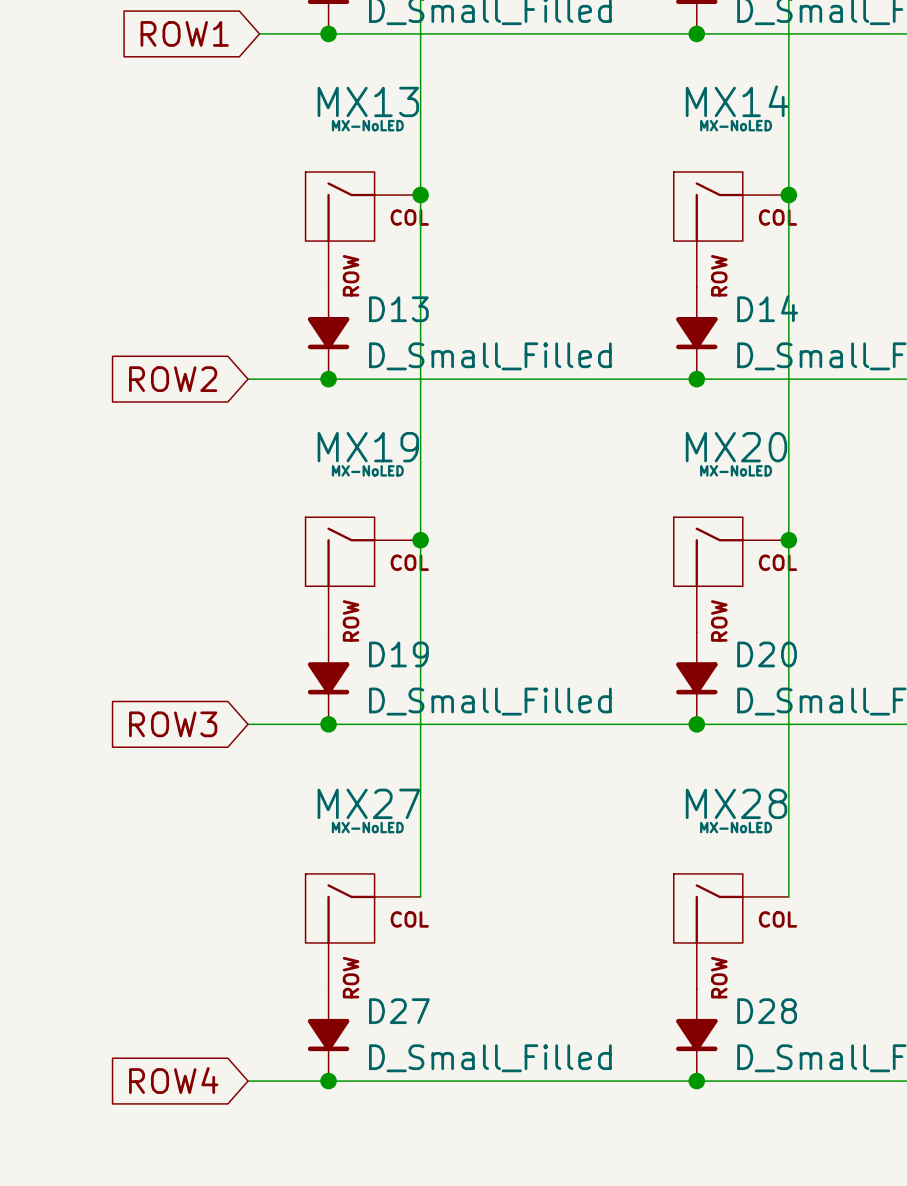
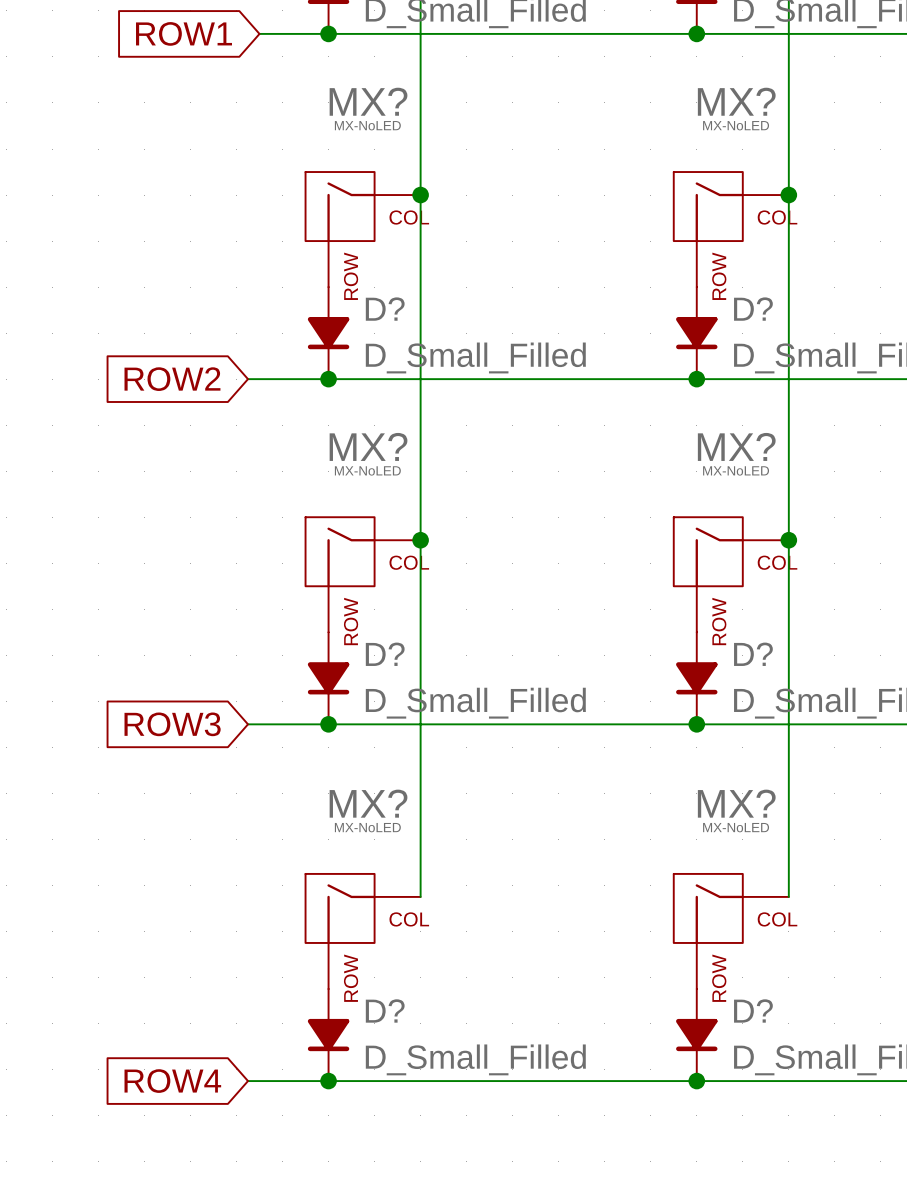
MX13 name: MX13 (368, 101) -> MX? (368, 101)
MX14 name: MX14 (737, 101) -> MX? (736, 101)
D14 name: D14 (767, 308) -> D? (753, 309)
D13 name: D13 (398, 309) -> D? (385, 309)
MX19 name: MX19 (368, 447) -> MX? (368, 446)
MX20 name: MX20 (736, 447) -> MX? (736, 446)
D19 name: D19 (398, 654) -> D? (385, 654)
D20 name: D20 (767, 654) -> D? (753, 654)
MX27 name: MX27 (368, 803) -> MX? (368, 803)
MX28 name: MX28 (736, 803) -> MX? (736, 803)
D27 name: D27 (399, 1011) -> D? (385, 1010)
D28 name: D28 (767, 1011) -> D? (753, 1010)

